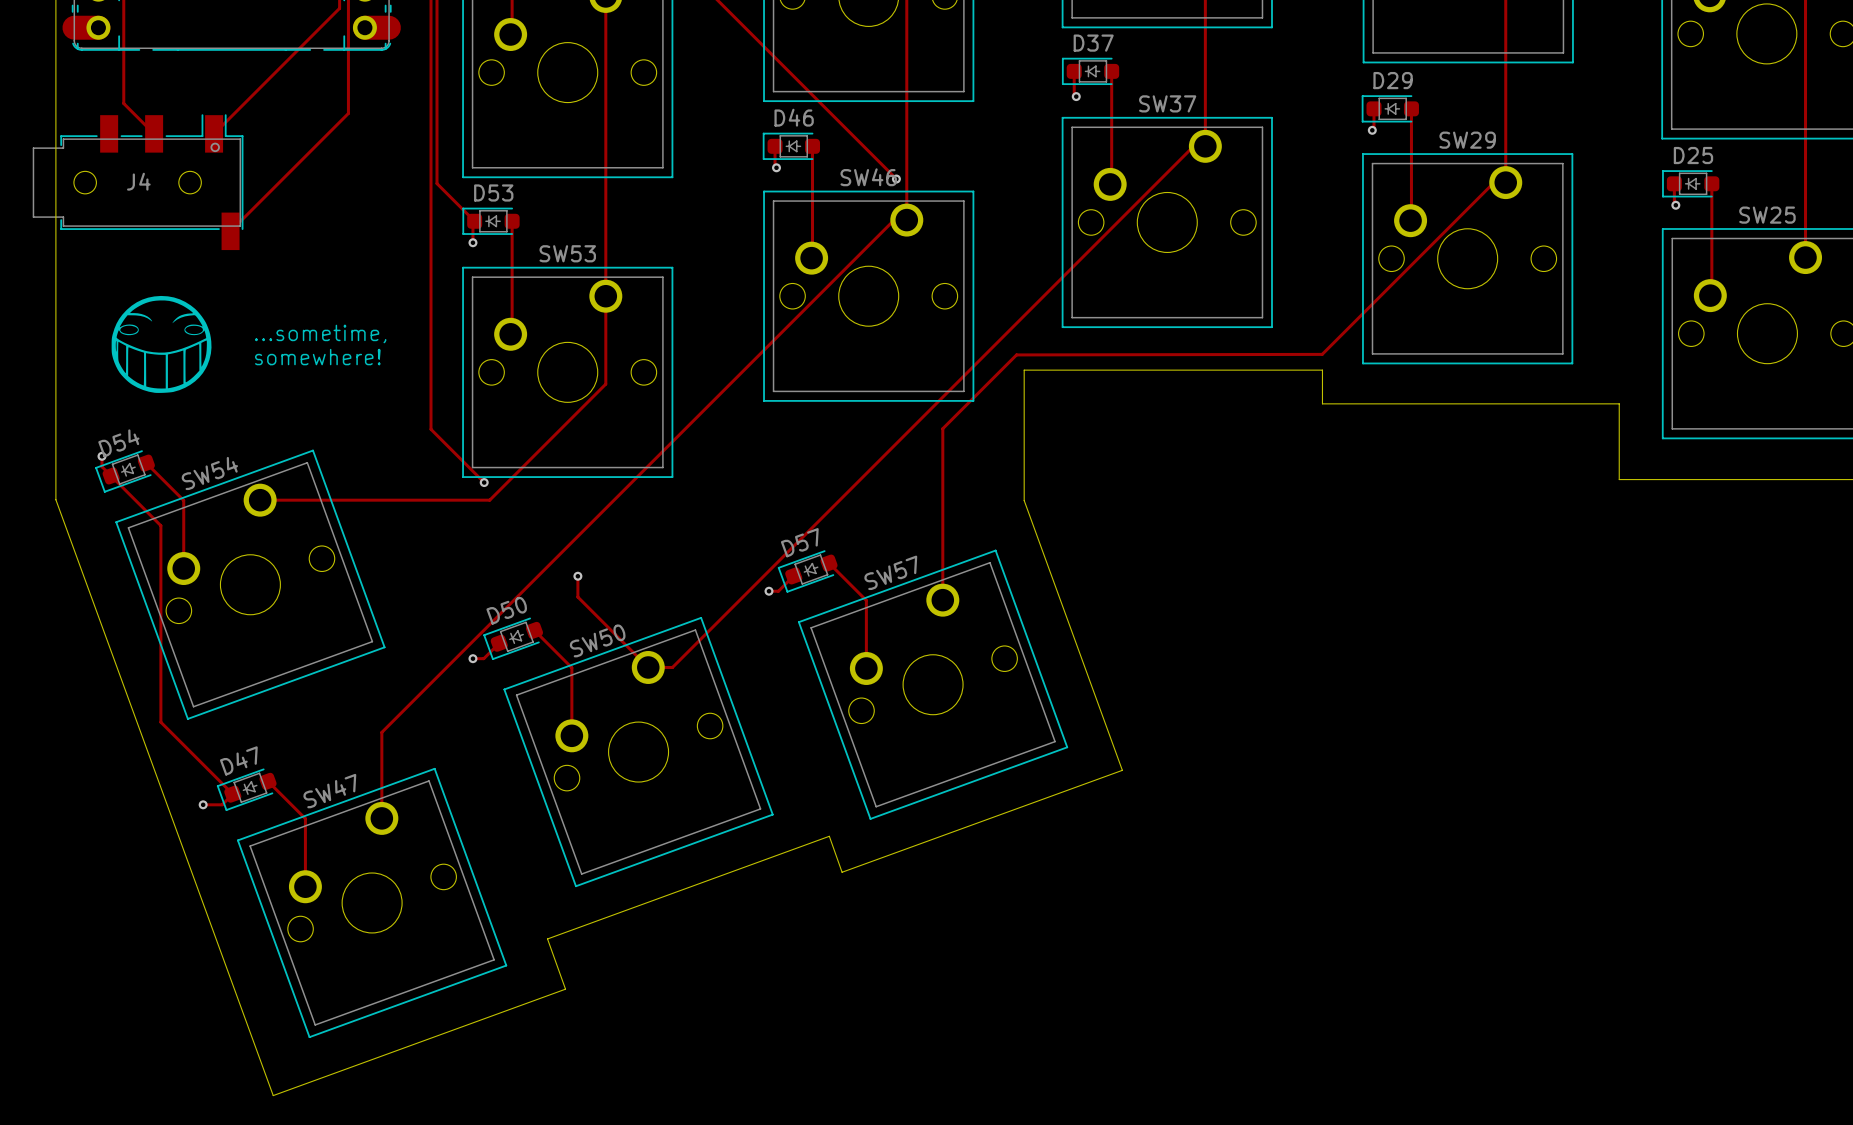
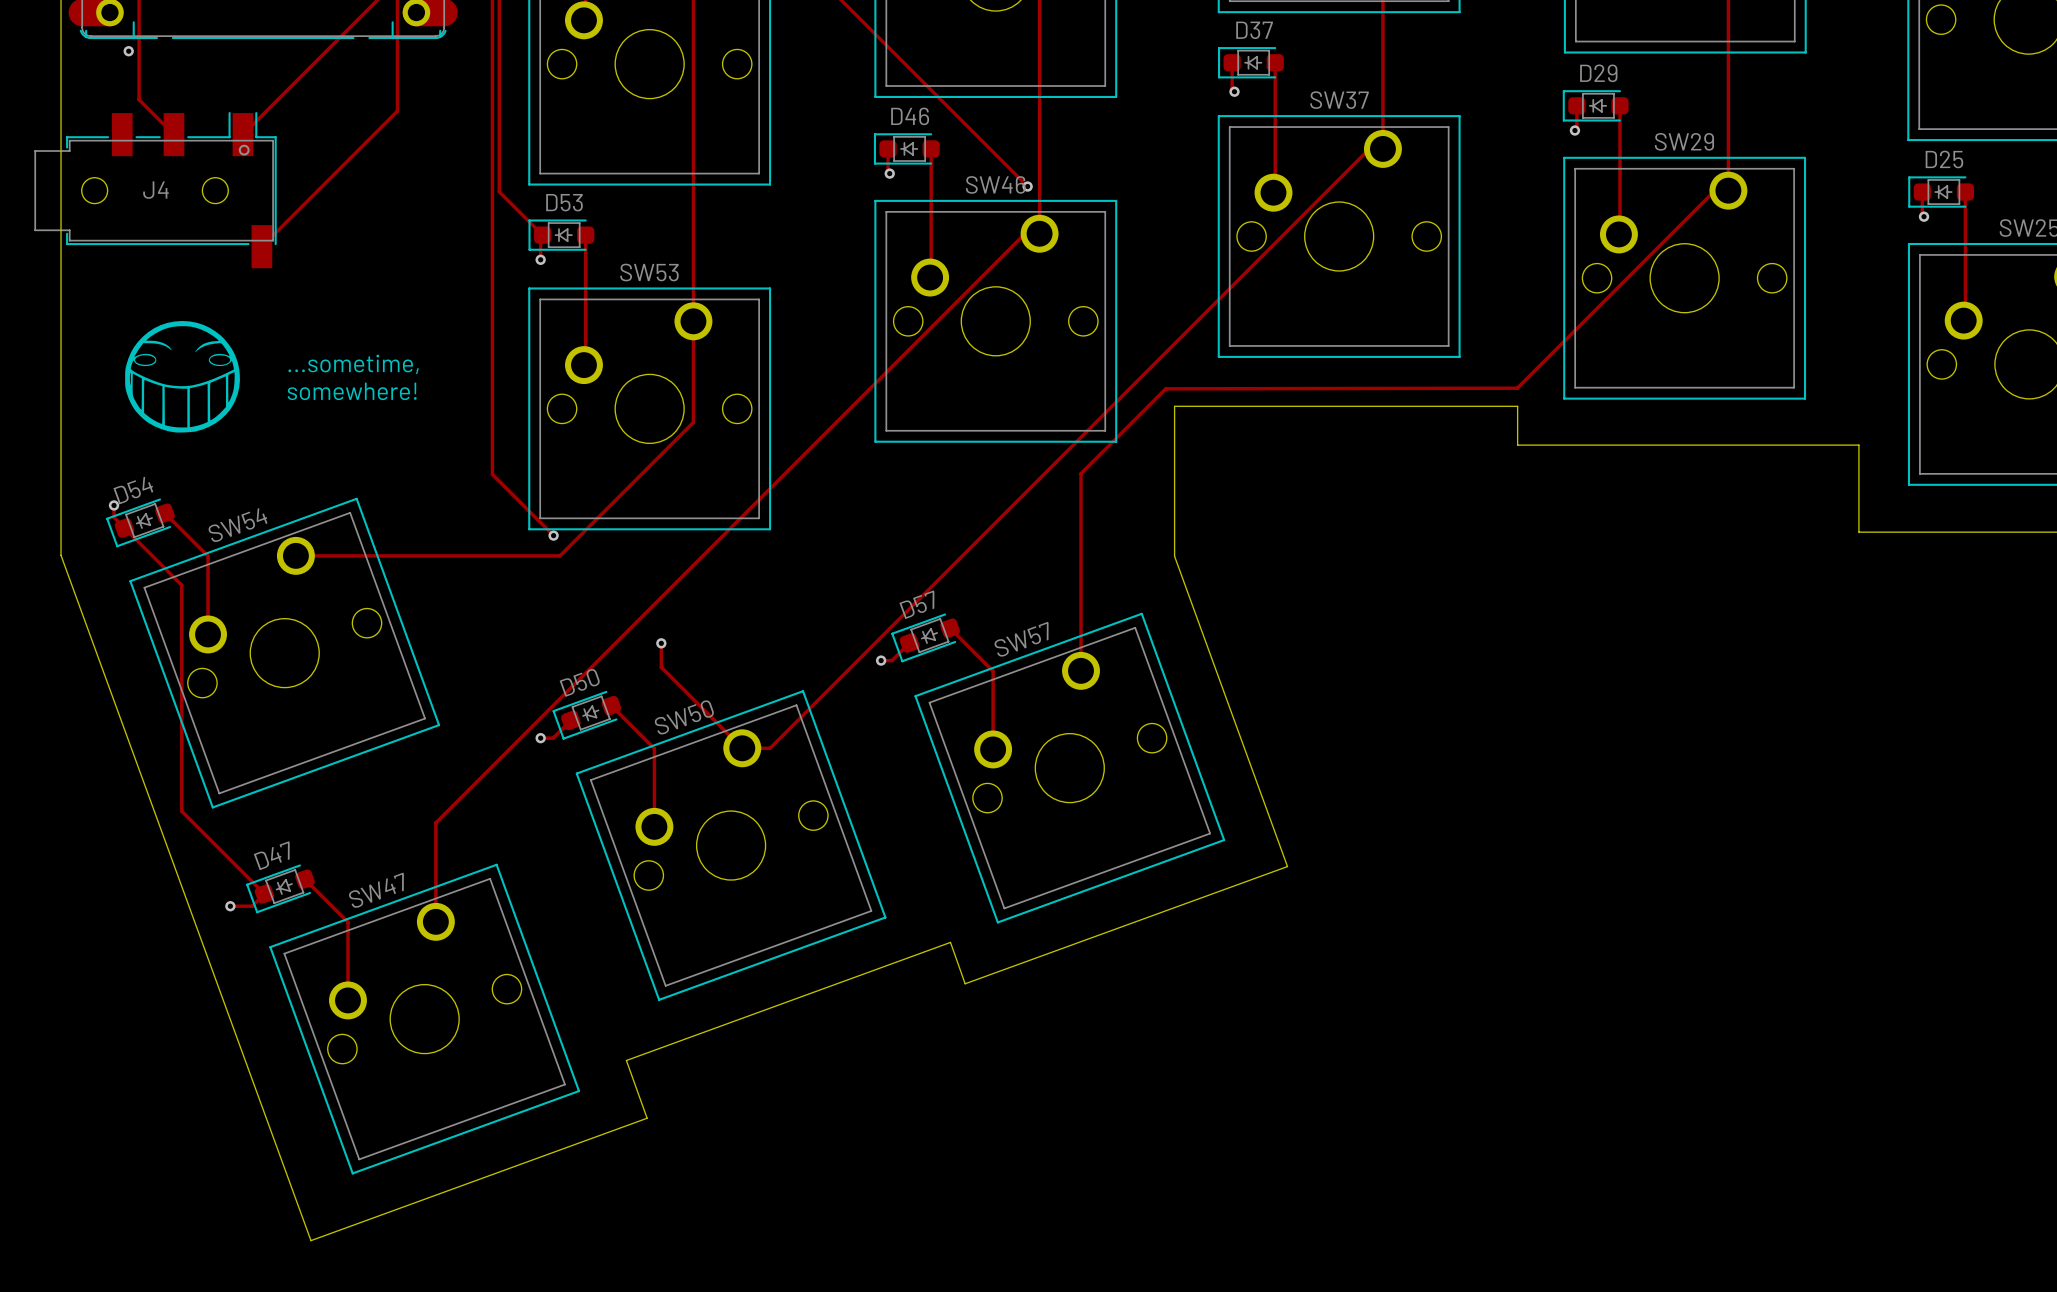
via: none -> (128, 51)

